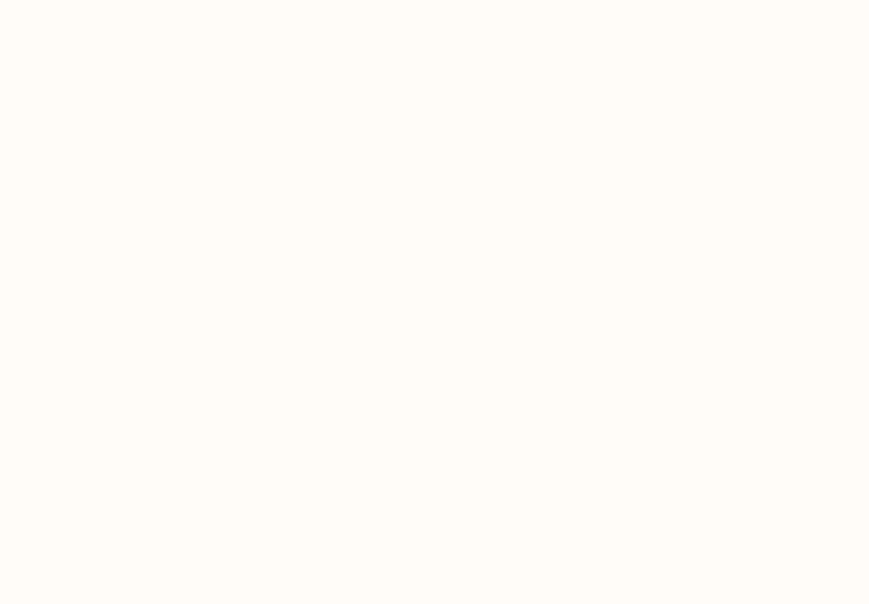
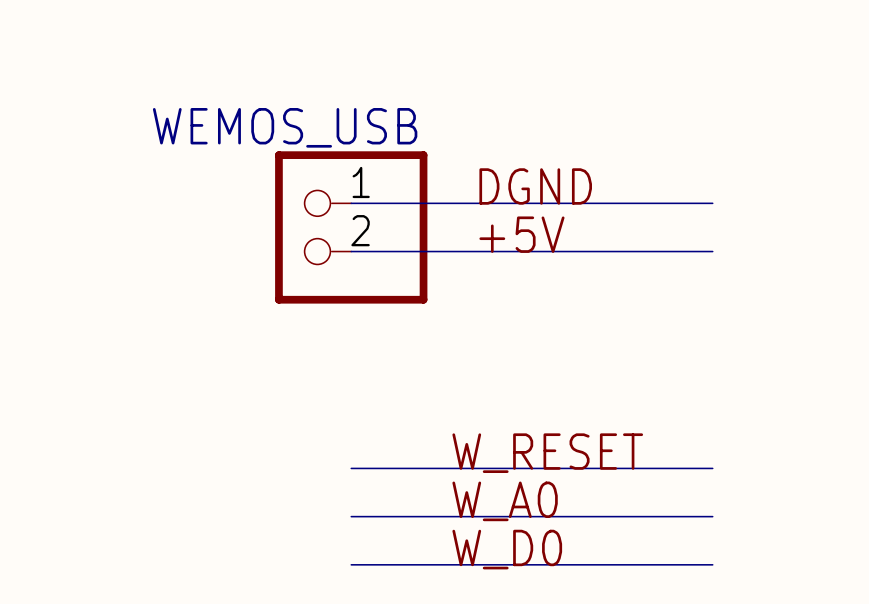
label: none -> DGND (535, 186)
wire: none -> (351, 203) (712, 203)
WEMOS_USB: none -> (351, 227)
label: none -> +5V (521, 234)
wire: none -> (351, 251) (712, 251)
label: none -> W_RESET (547, 453)
wire: none -> (351, 468) (712, 468)
label: none -> W_A0 (505, 501)
wire: none -> (351, 516) (712, 516)
label: none -> W_D0 (507, 549)
wire: none -> (351, 564) (712, 564)

